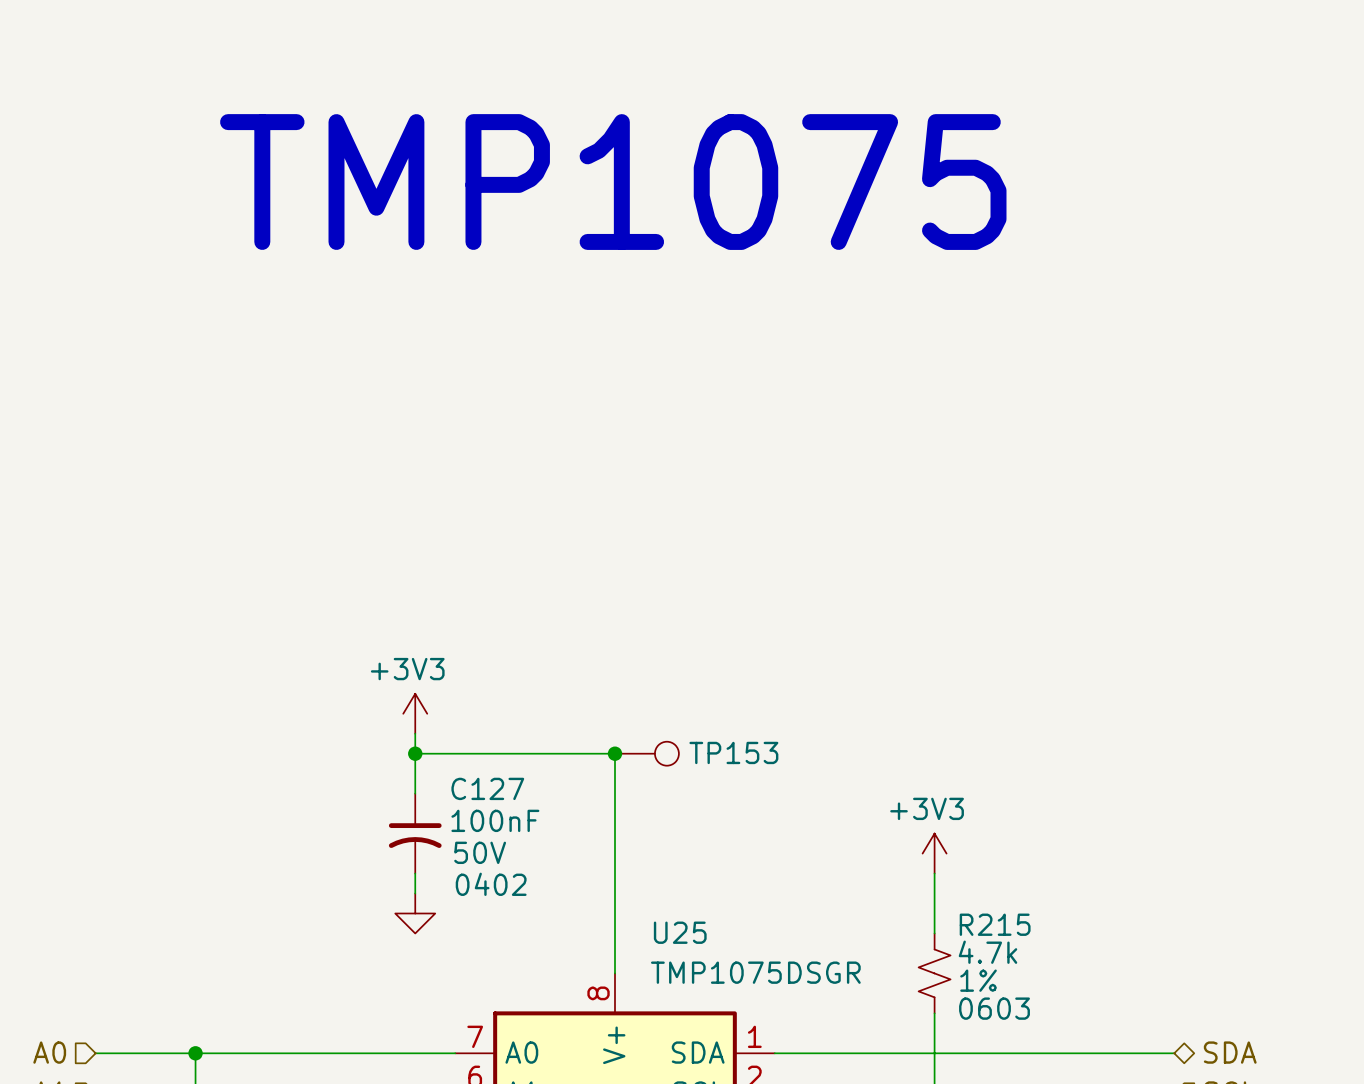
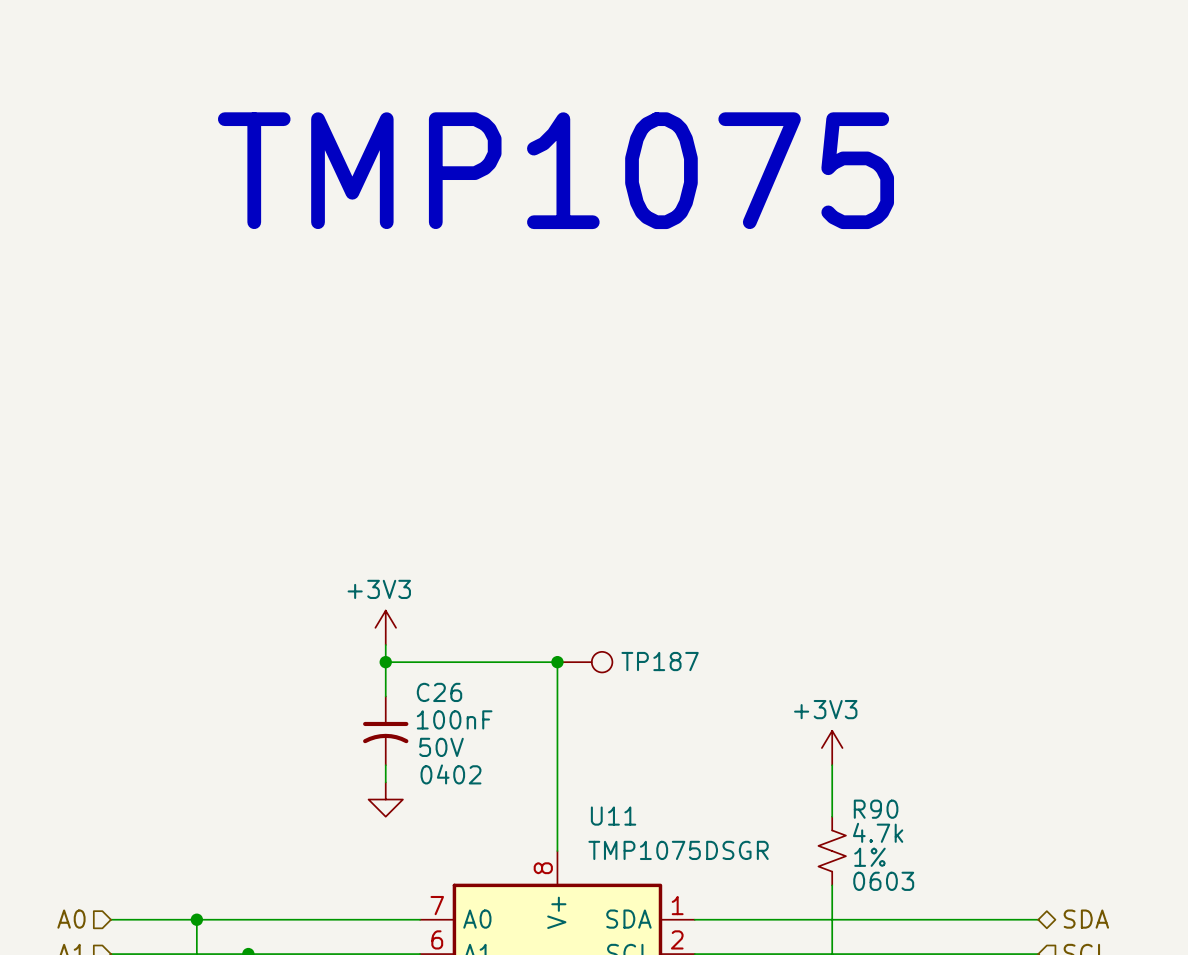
TP153 name: TP153 (733, 752) -> TP187 (660, 661)
C127 name: C127 (487, 788) -> C26 (439, 692)
R215 name: R215 (995, 924) -> R90 (876, 809)
U25 name: U25 (680, 932) -> U11 (613, 816)

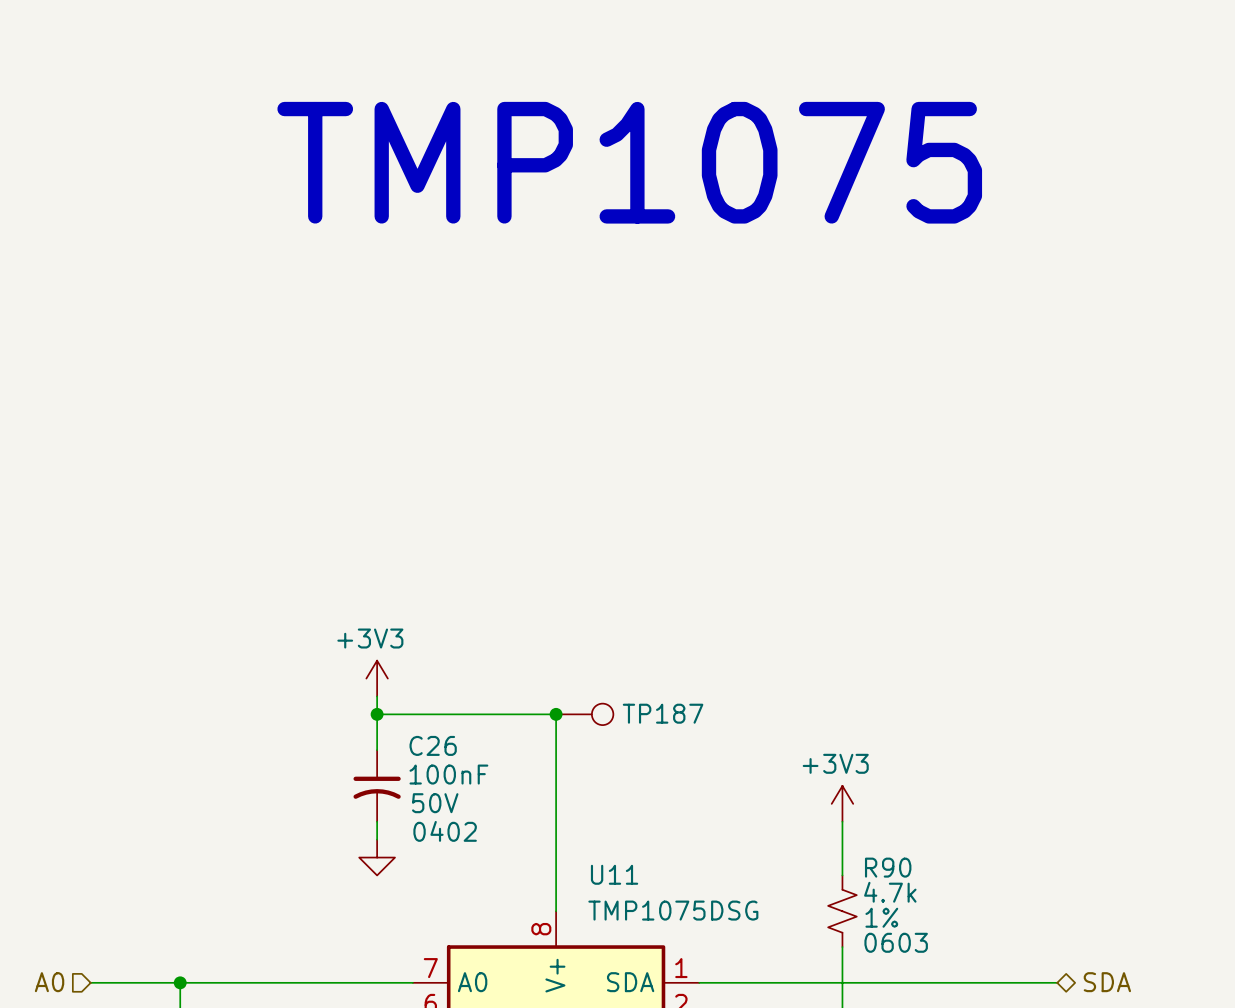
text position: TMP1075 (555, 170) -> TMP1075 (629, 162)
U11 value: TMP1075DSGR (678, 850) -> TMP1075DSG (673, 910)

